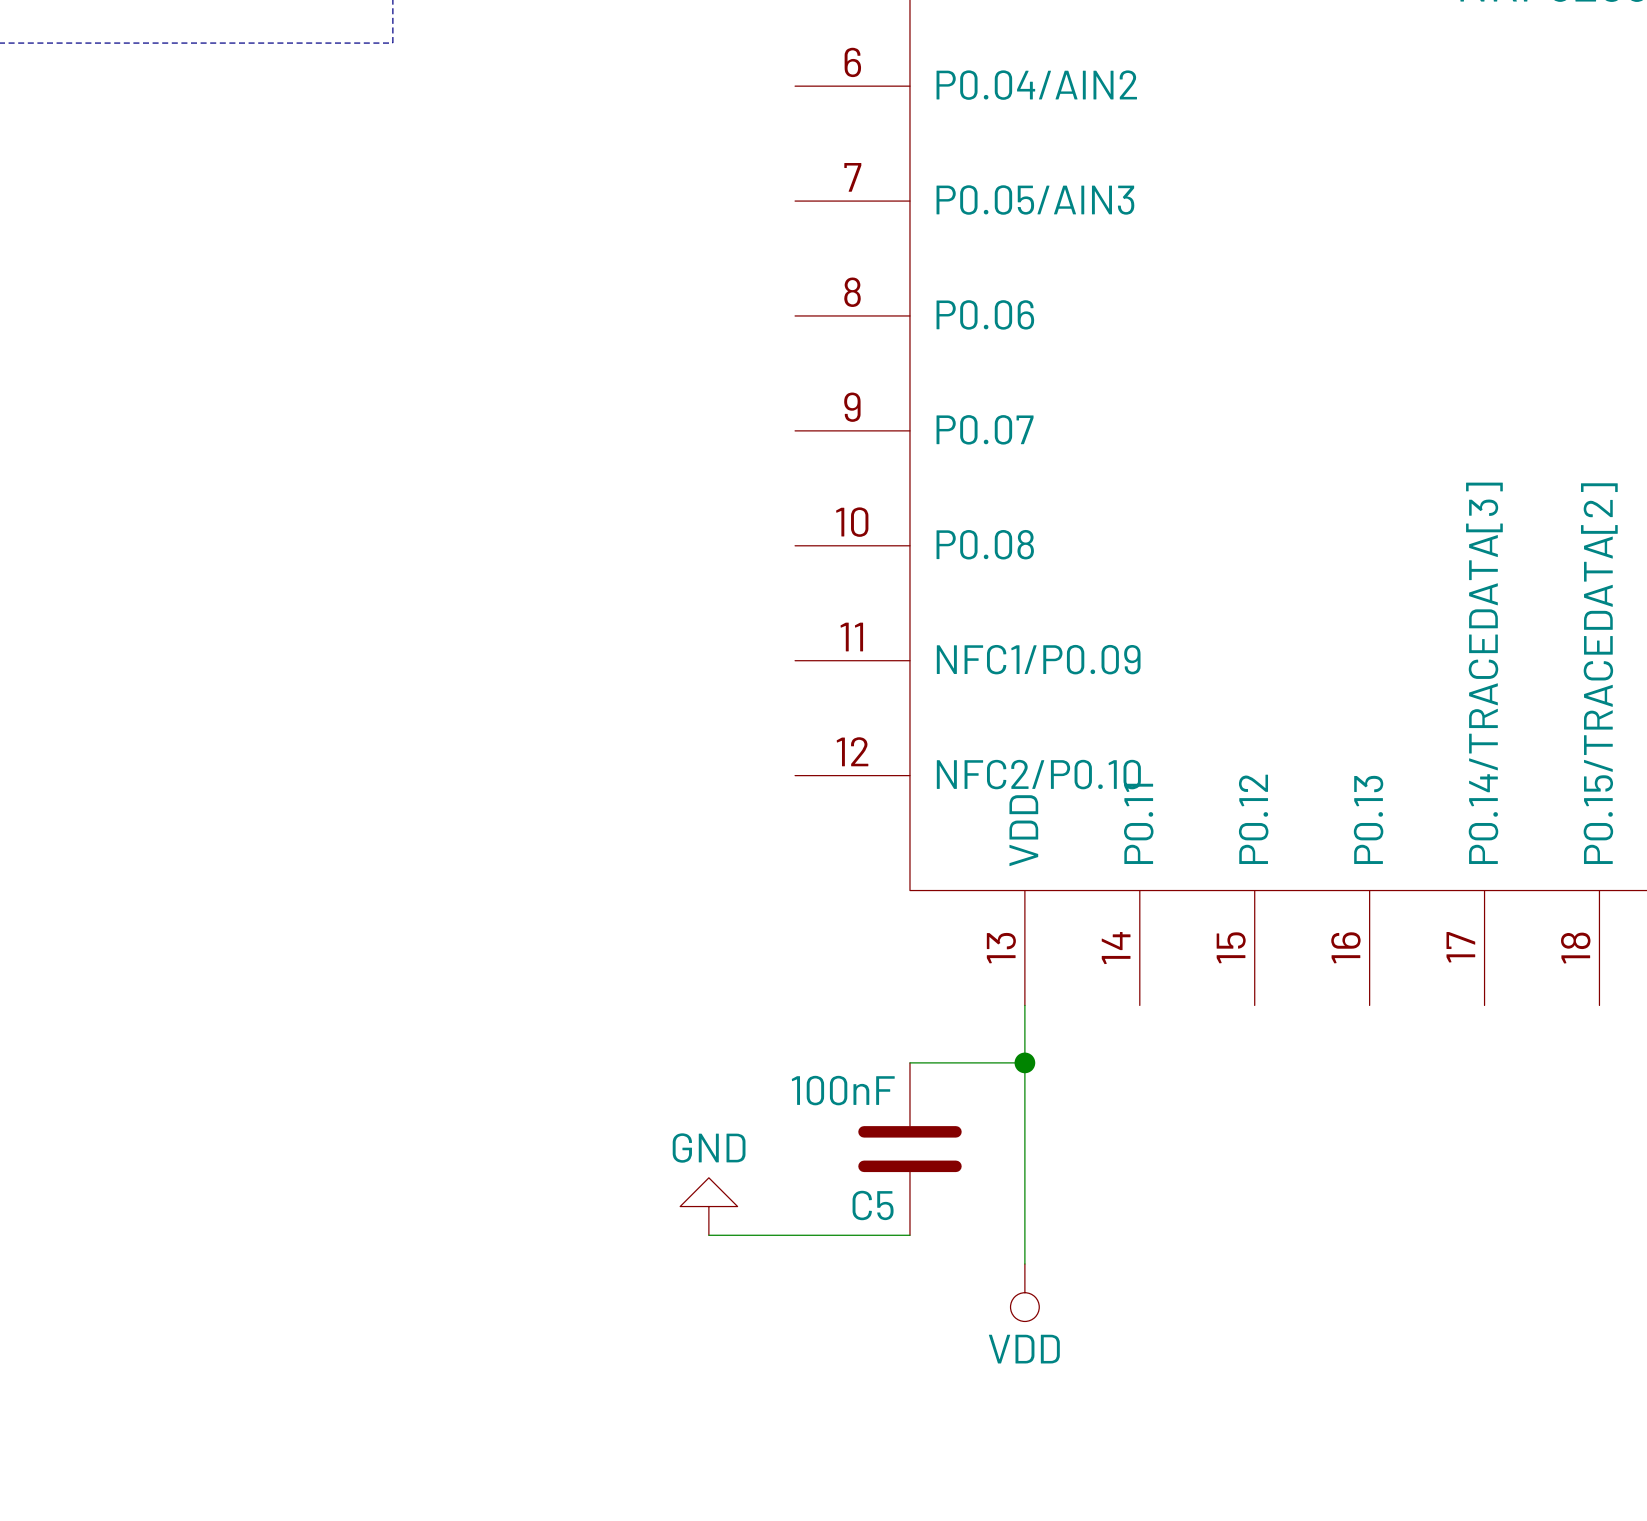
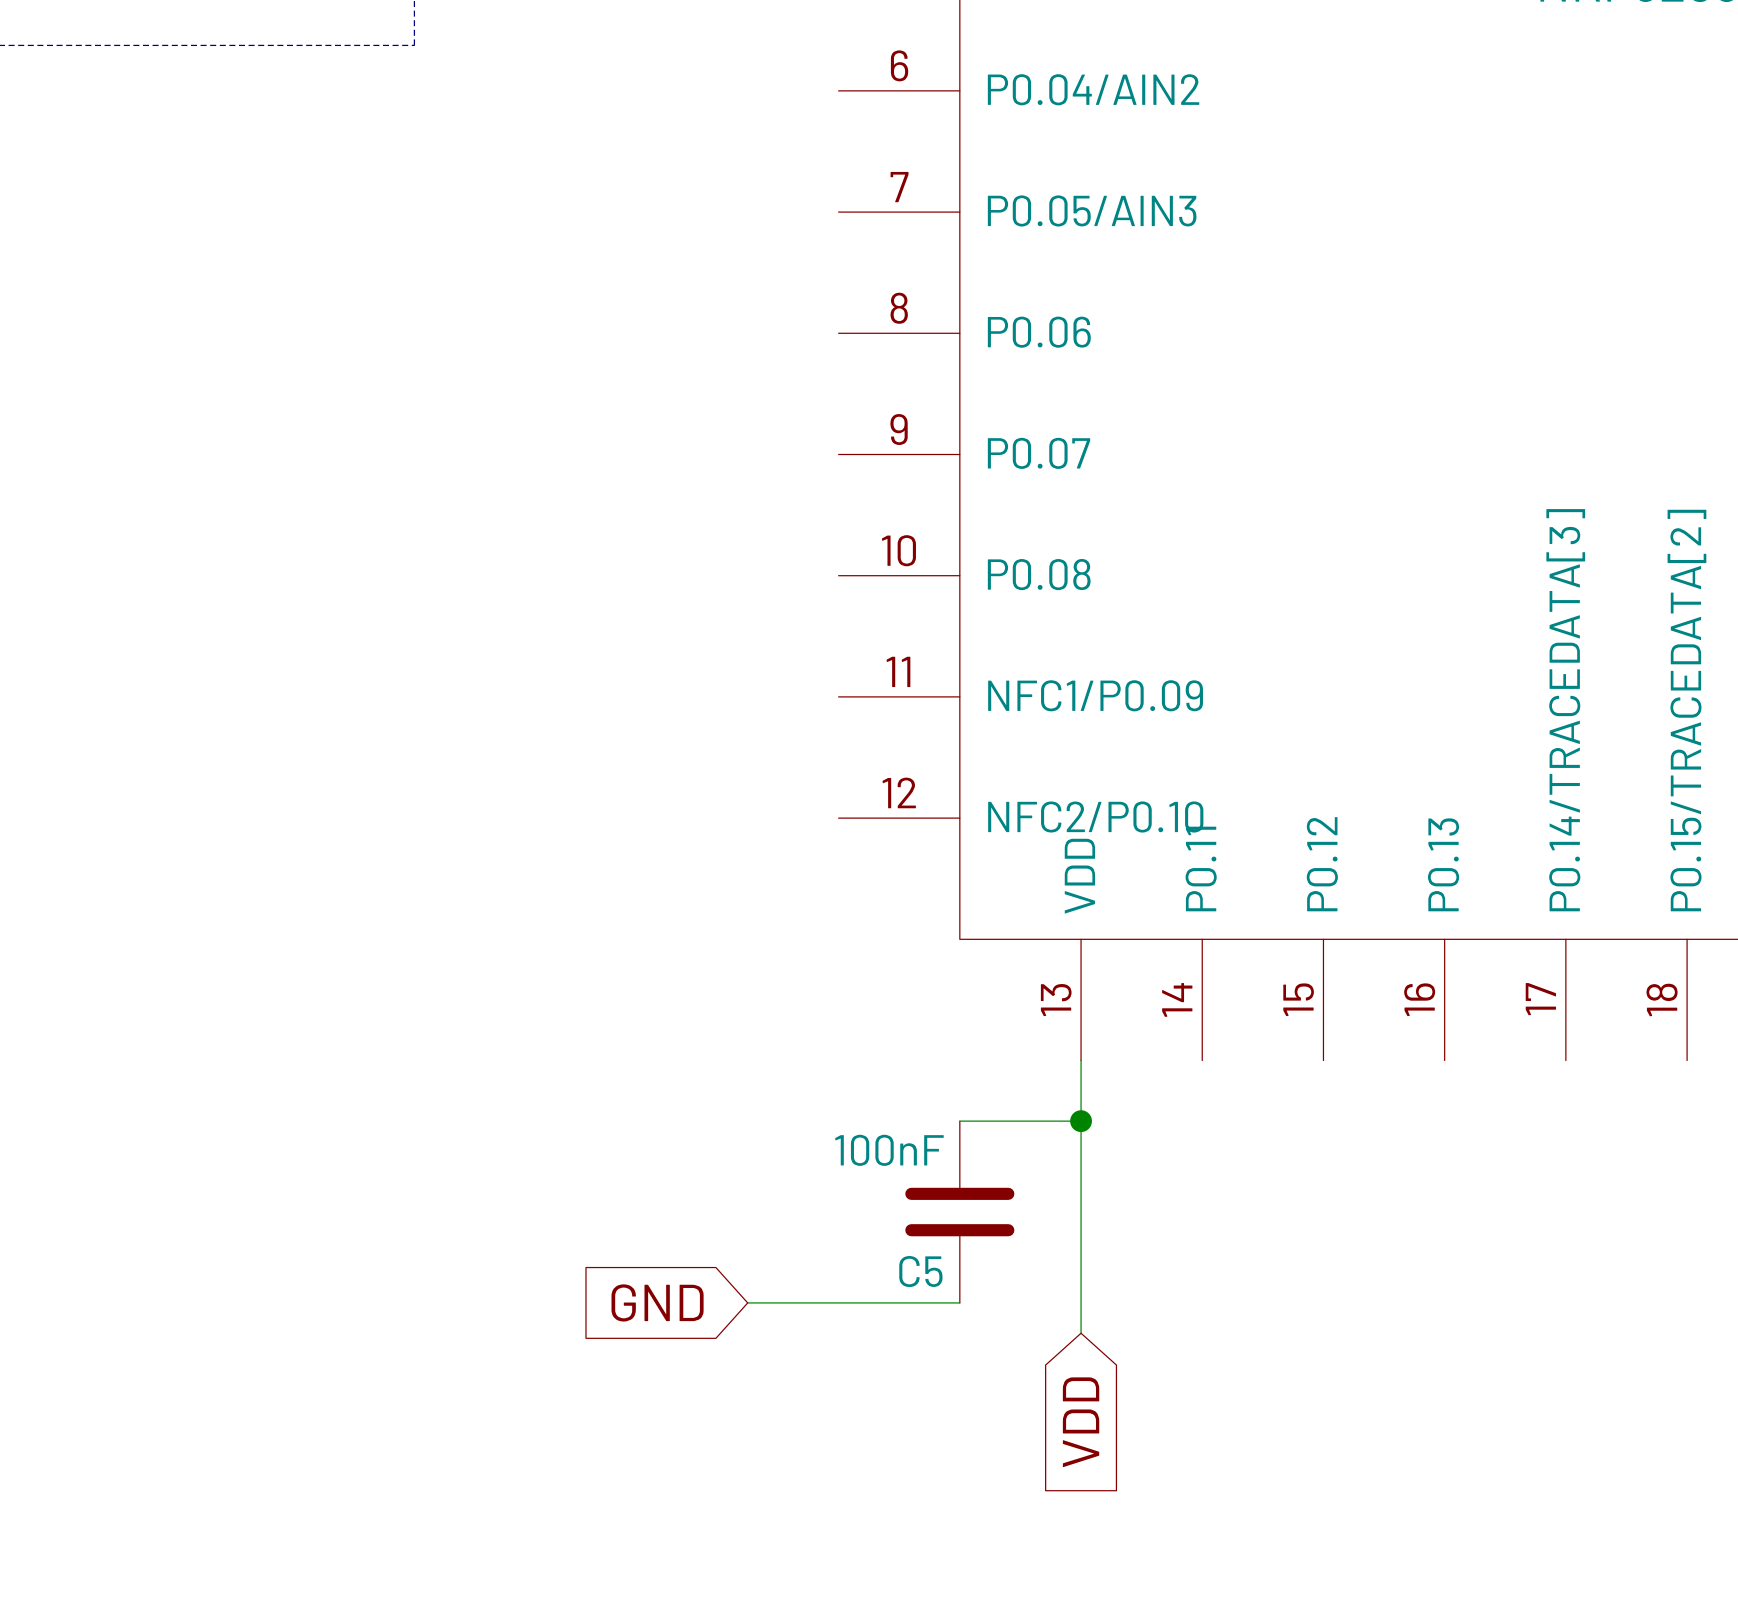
power symbol: GND (708, 1206) -> none
global label: none -> GND (657, 1302)
power symbol: VDD (1024, 1292) -> none
global label: none -> VDD (1081, 1422)

